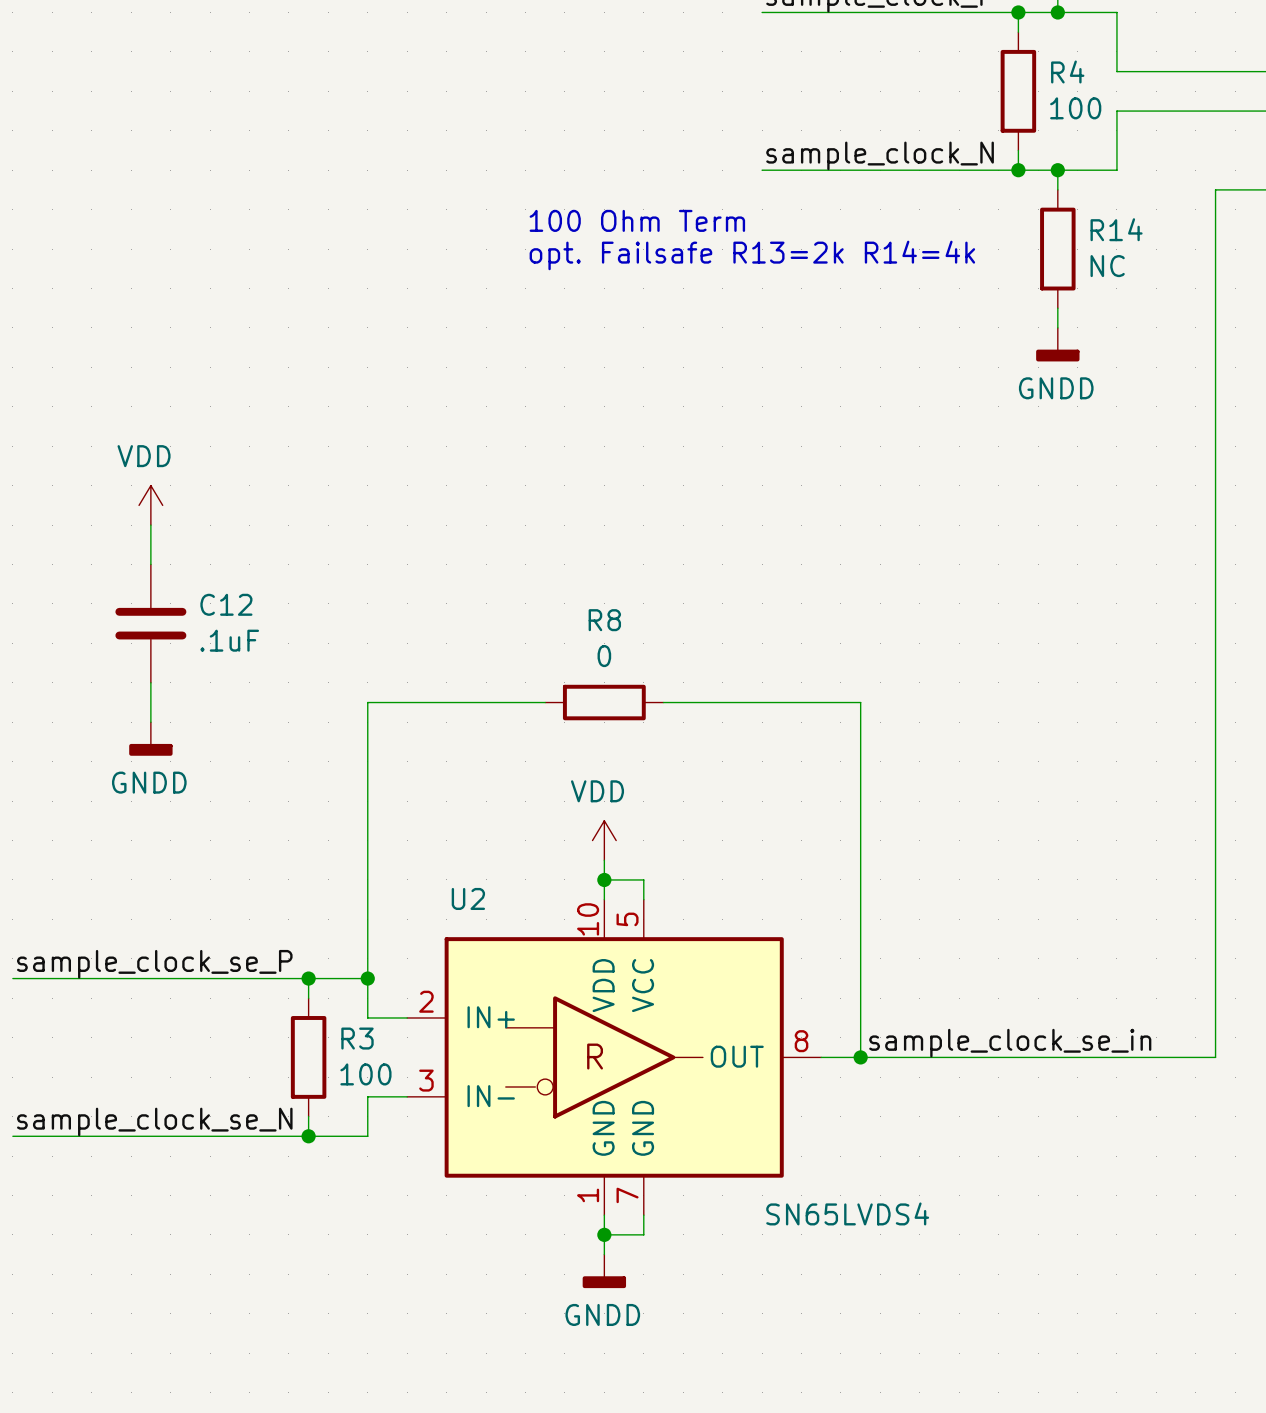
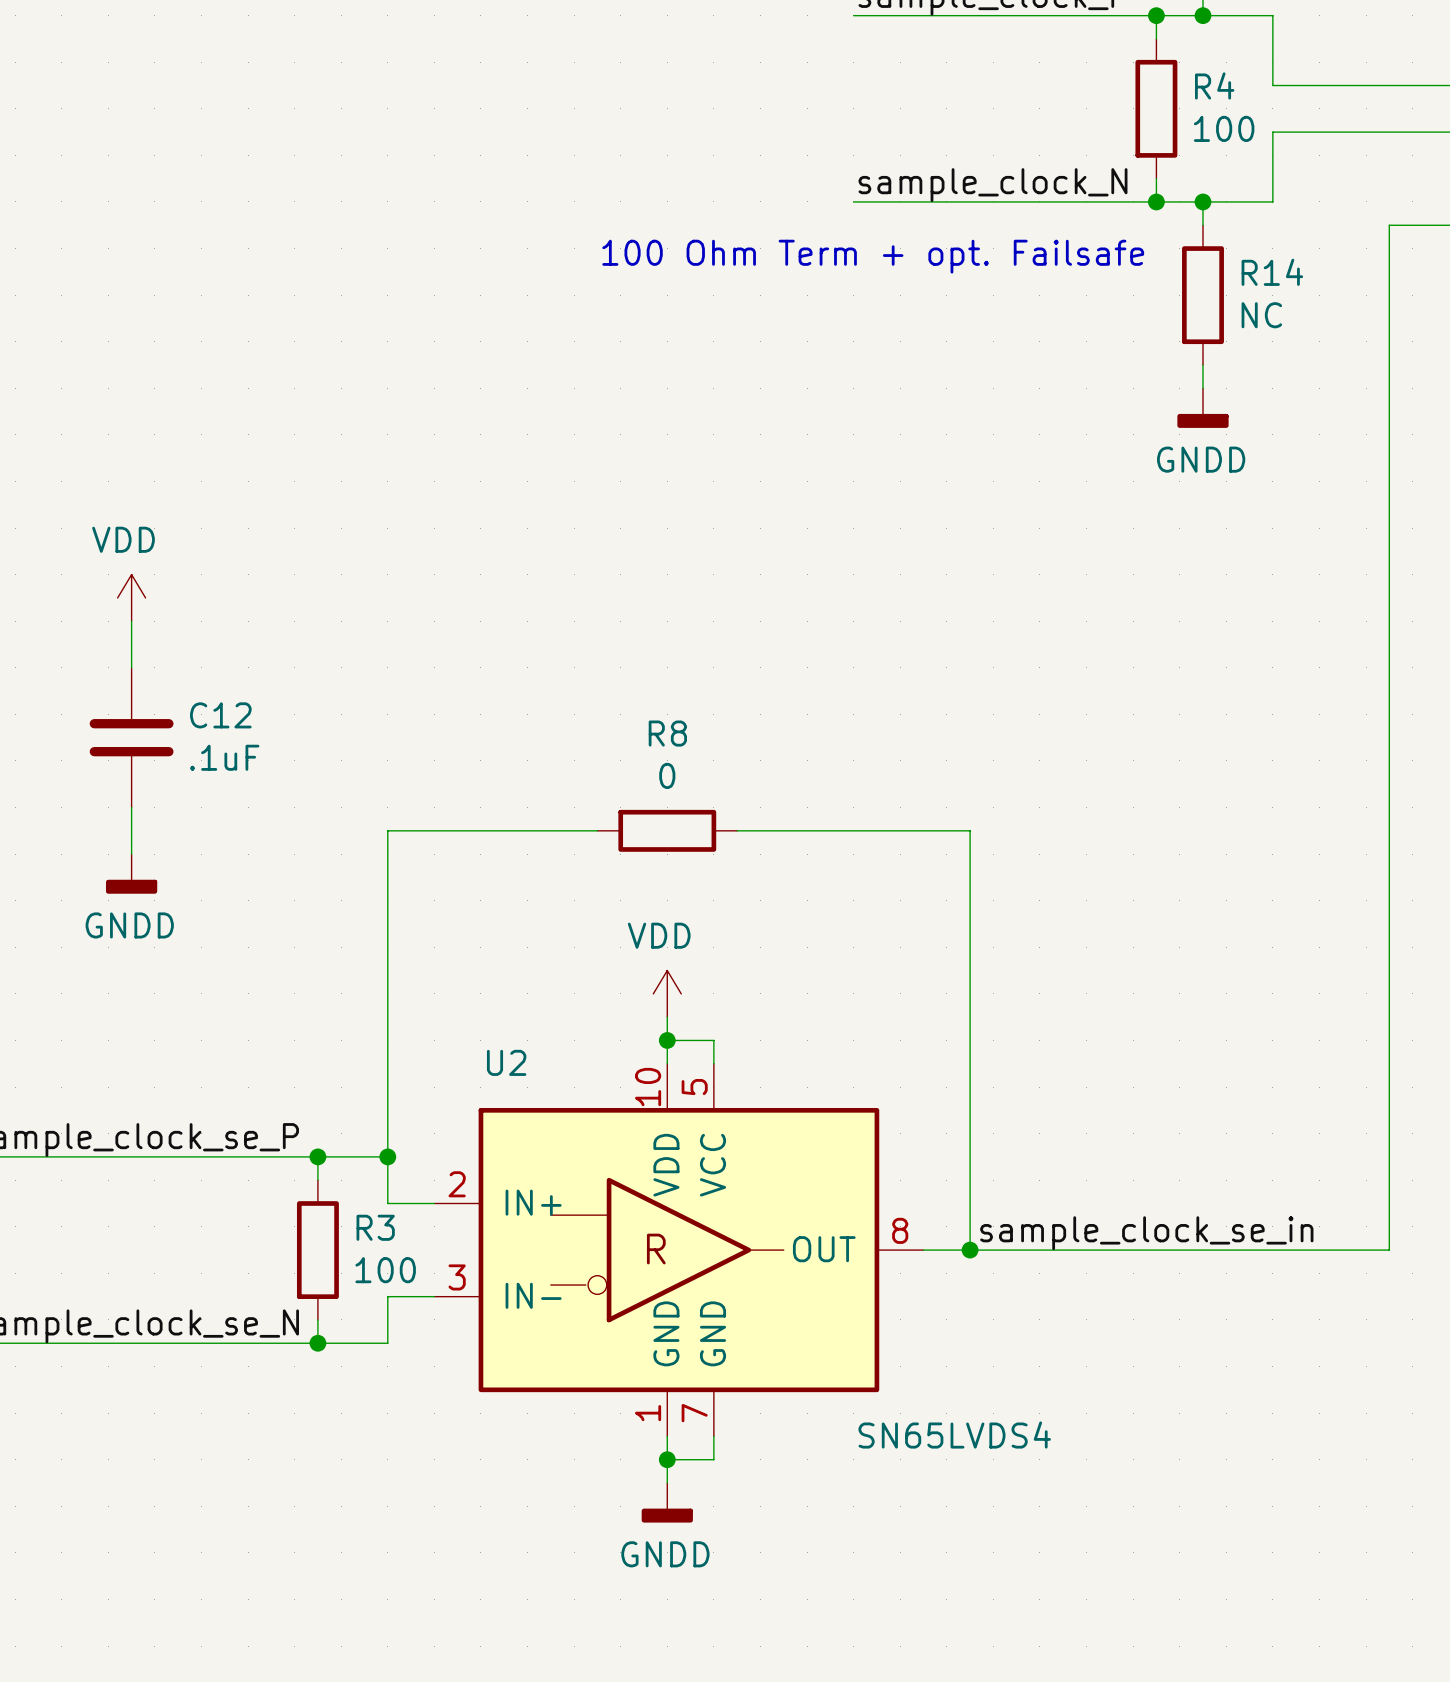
text: none -> 100 Ohm Term + opt. Failsafe (873, 256)
text: 100 Ohm Term (637, 220) -> none
text: opt. Failsafe R13=2k R14=4k (752, 255) -> none

